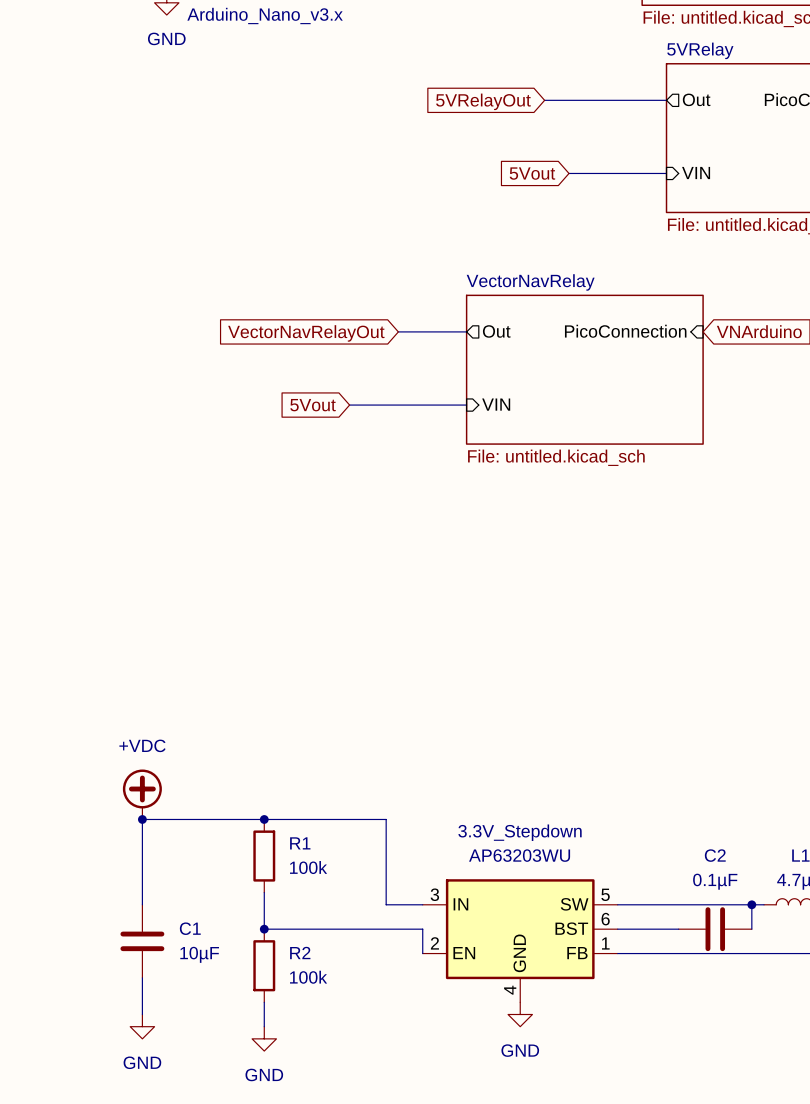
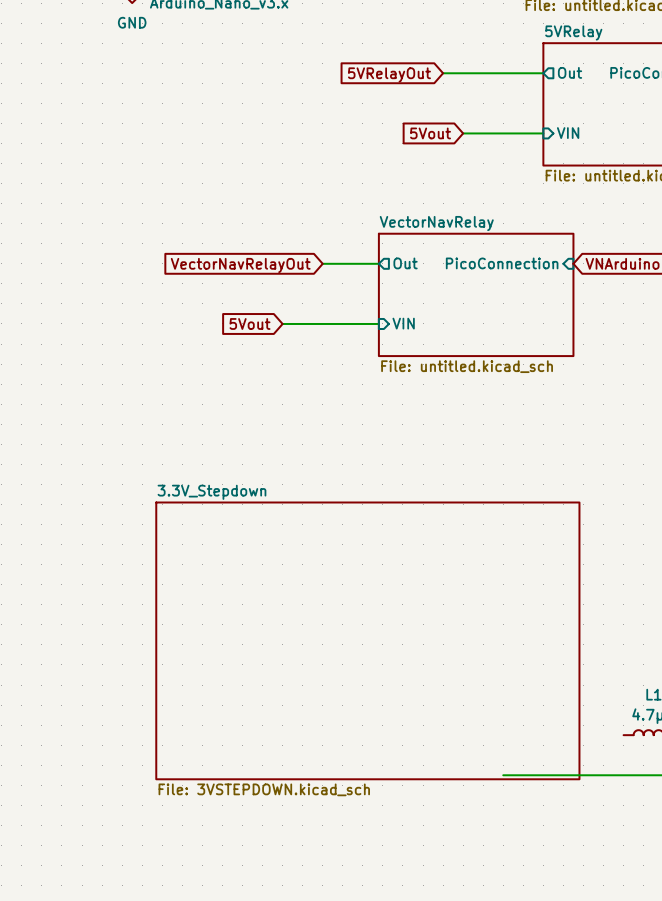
sheet 3.3V_Stepdown: none -> File: 3VSTEPDOWN.kicad_sch (367, 640)
power symbol: +VDC (142, 794) -> none
junction: (142, 819) -> none
junction: (264, 819) -> none
R1: 100k (264, 856) -> none
wire: (264, 892) (264, 929) (422, 929) (422, 953) -> none
wire: (142, 904) (142, 819) (386, 819) (386, 904) (422, 904) -> none
wire: (617, 904) (764, 904) -> none
wire: (751, 904) (751, 929) -> none
junction: (751, 904) -> none
junction: (264, 929) -> none
wire: (617, 929) (678, 929) -> none
C2: 0.1µF (715, 929) -> none
3.3V_Stepdown: AP63203WU (520, 940) -> none
C1: 10µF (142, 941) -> none
R2: 100k (264, 965) -> none
wire: (142, 977) (142, 1014) -> none
wire: (264, 1002) (264, 1026) -> none
power symbol: GND (520, 1014) -> none
power symbol: GND (142, 1026) -> none
power symbol: GND (264, 1038) -> none

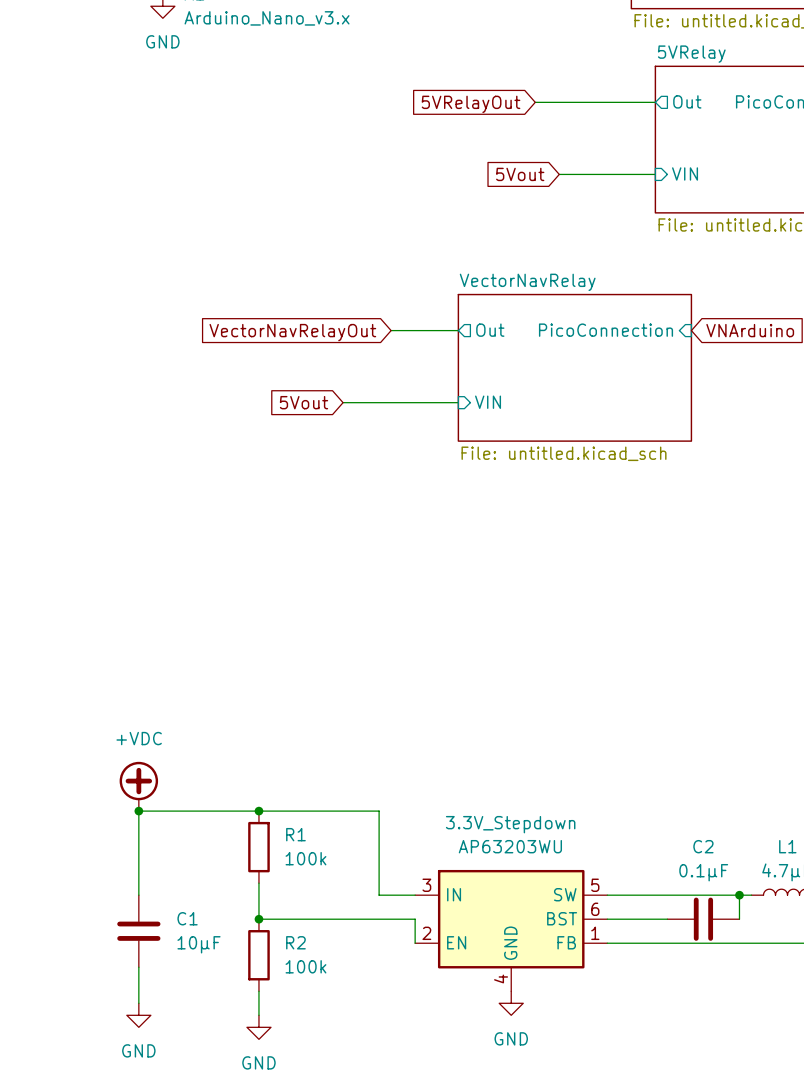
sheet 3.3V_Stepdown: File: 3VSTEPDOWN.kicad_sch (367, 640) -> none
power symbol: none -> +VDC (138, 786)
junction: none -> (138, 811)
junction: none -> (258, 811)
R1: none -> 100k (258, 847)
wire: none -> (258, 883) (258, 919) (415, 919) (415, 943)
wire: none -> (138, 895) (138, 811) (379, 811) (379, 895) (415, 895)
wire: none -> (607, 895) (751, 895)
wire: none -> (739, 895) (739, 919)
junction: none -> (739, 895)
junction: none -> (258, 919)
wire: none -> (607, 919) (667, 919)
C2: none -> 0.1µF (703, 919)
3.3V_Stepdown: none -> AP63203WU (511, 930)
C1: none -> 10µF (138, 931)
R2: none -> 100k (258, 955)
wire: none -> (138, 967) (138, 1003)
wire: none -> (258, 991) (258, 1015)
power symbol: none -> GND (511, 1003)
power symbol: none -> GND (138, 1015)
power symbol: none -> GND (258, 1027)

